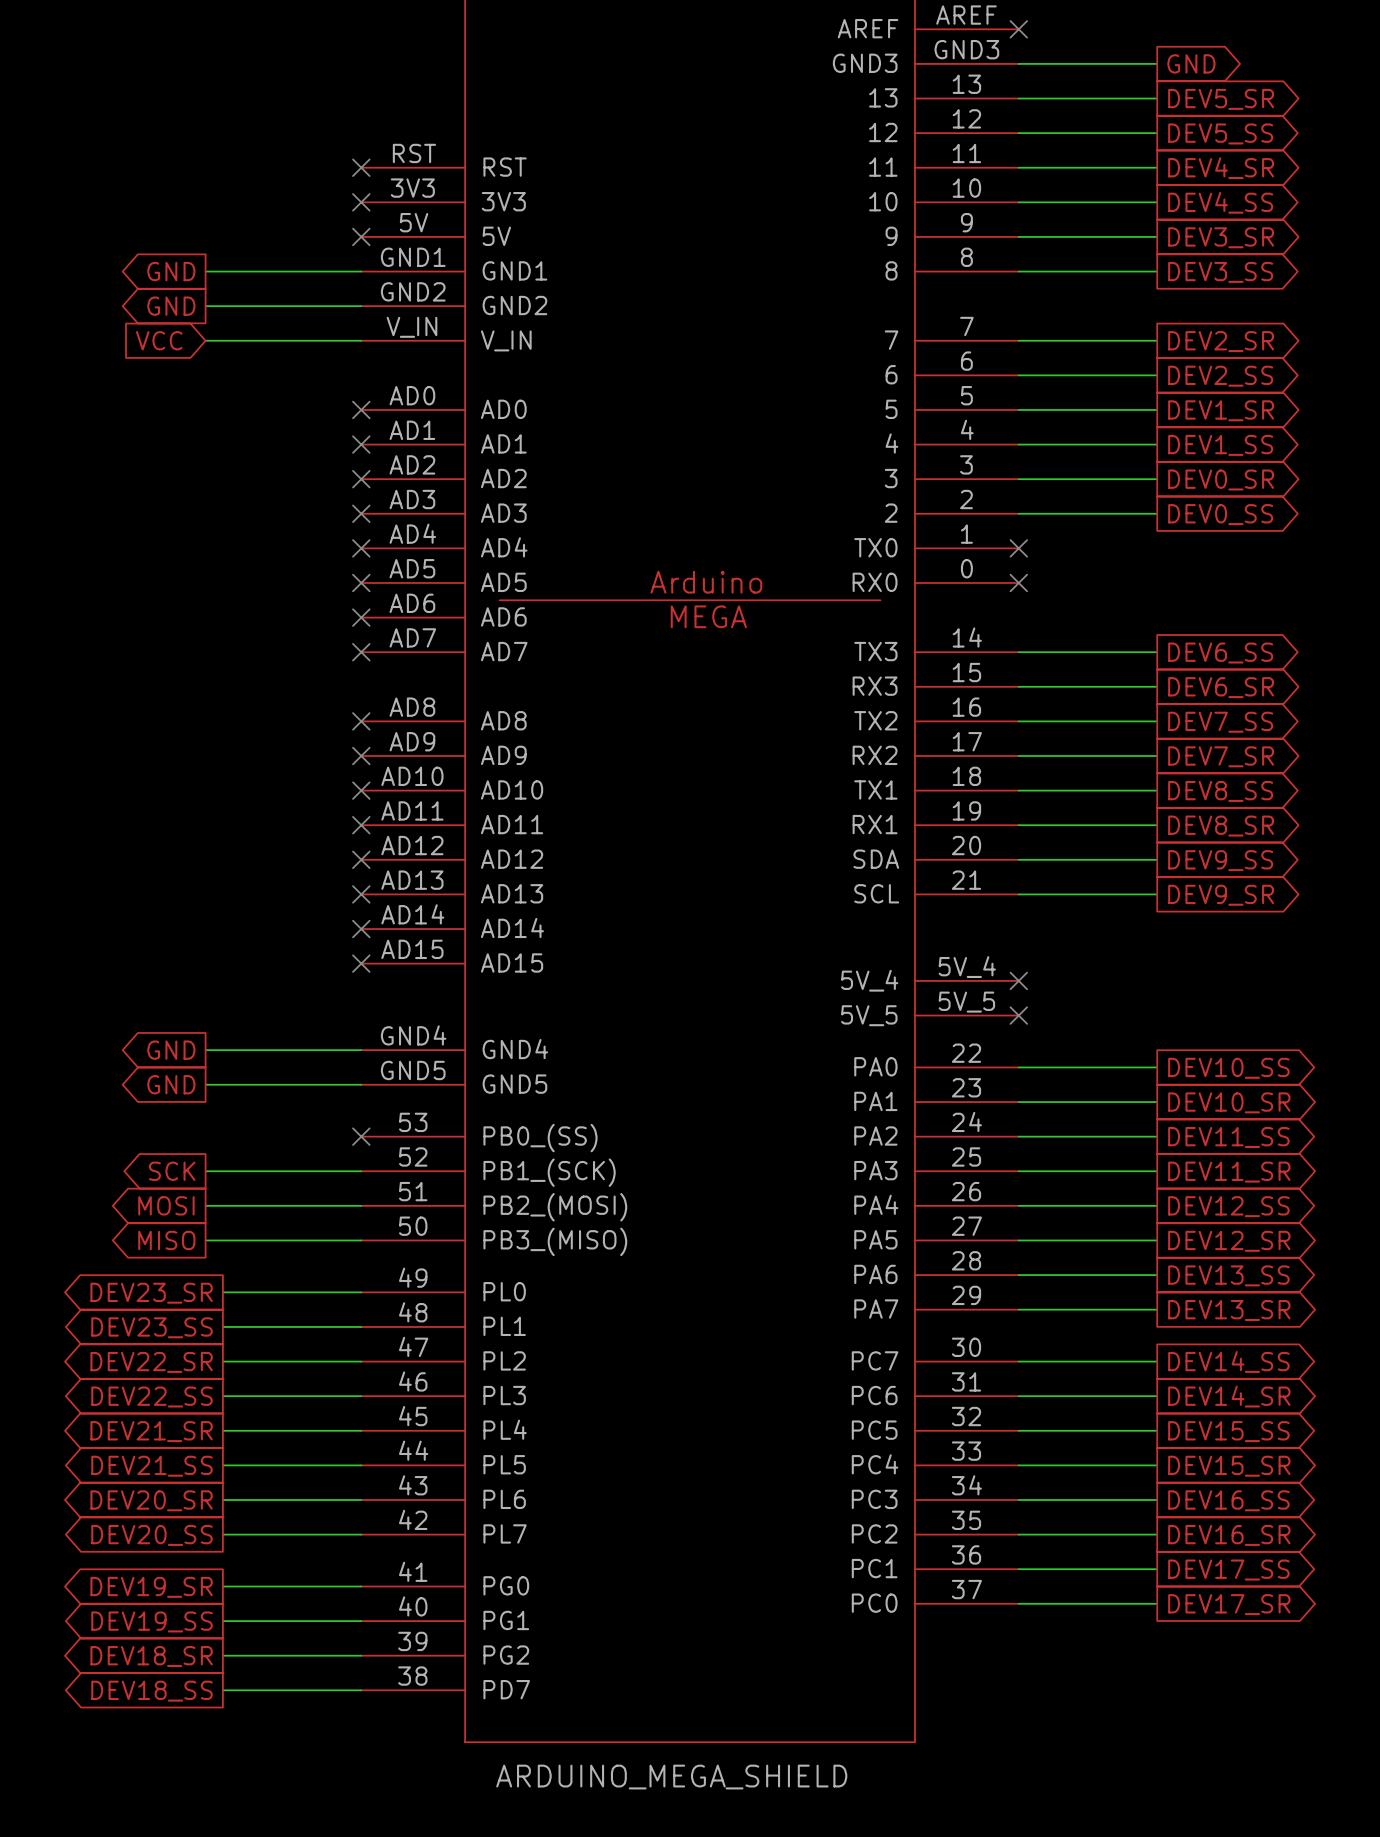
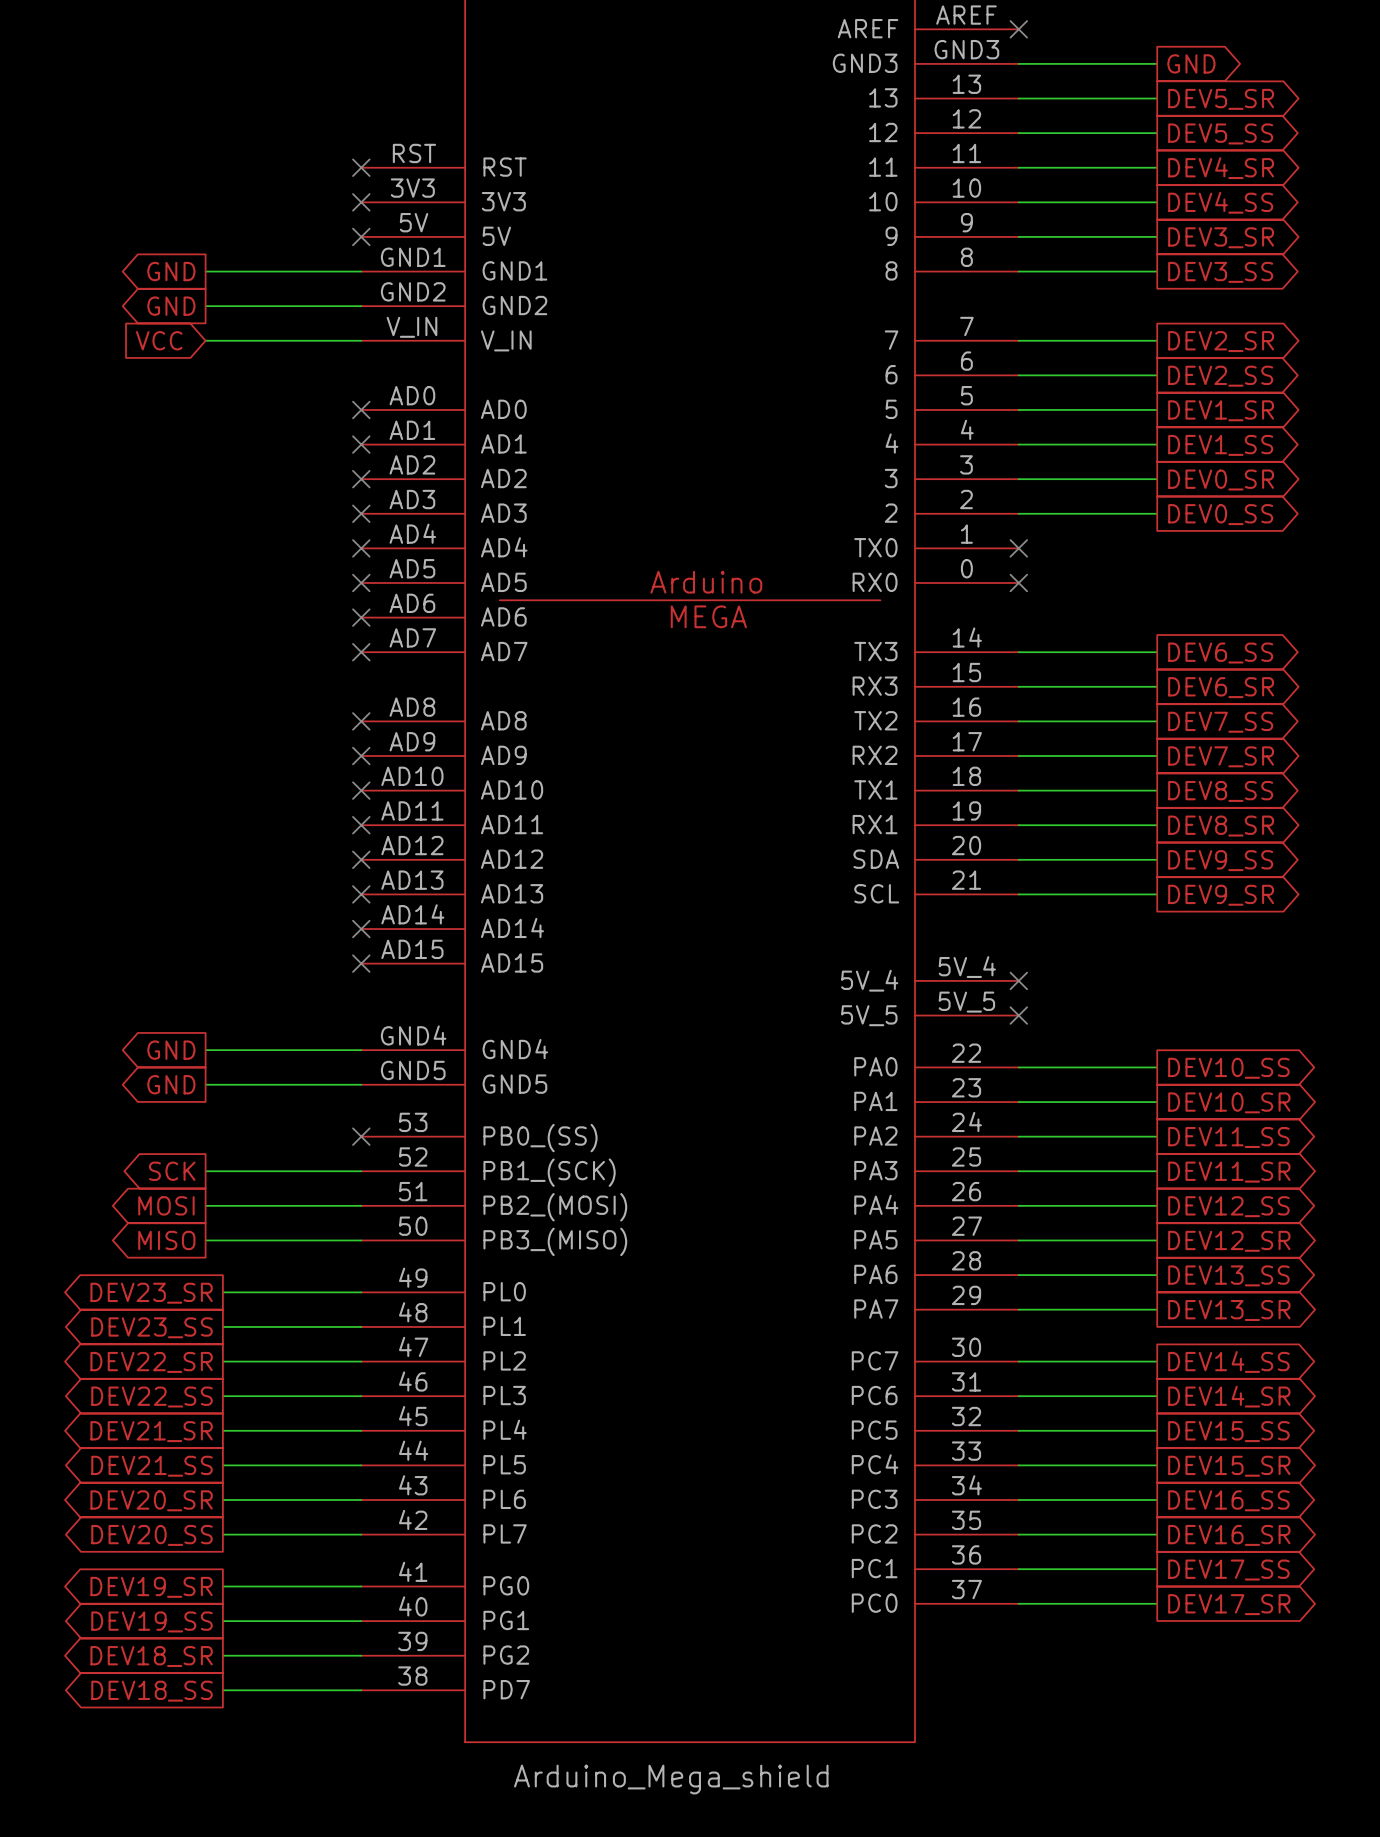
part value: ARDUINO_MEGA_SHIELD (671, 1777) -> Arduino_Mega_shield (671, 1779)

